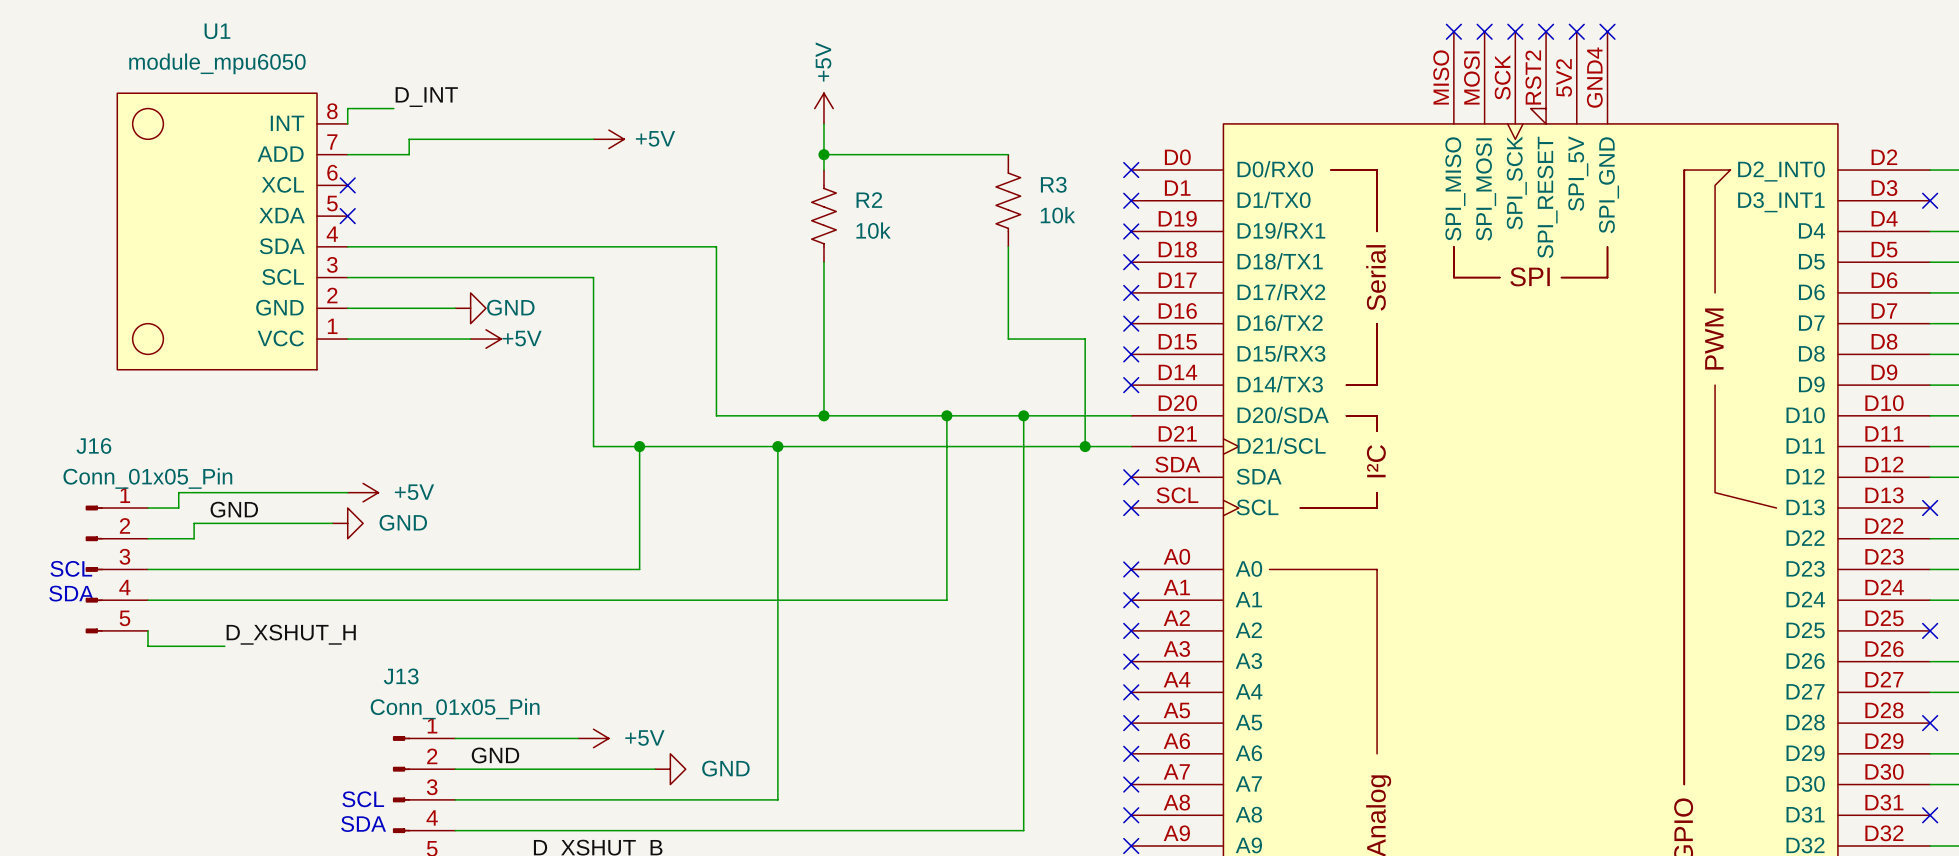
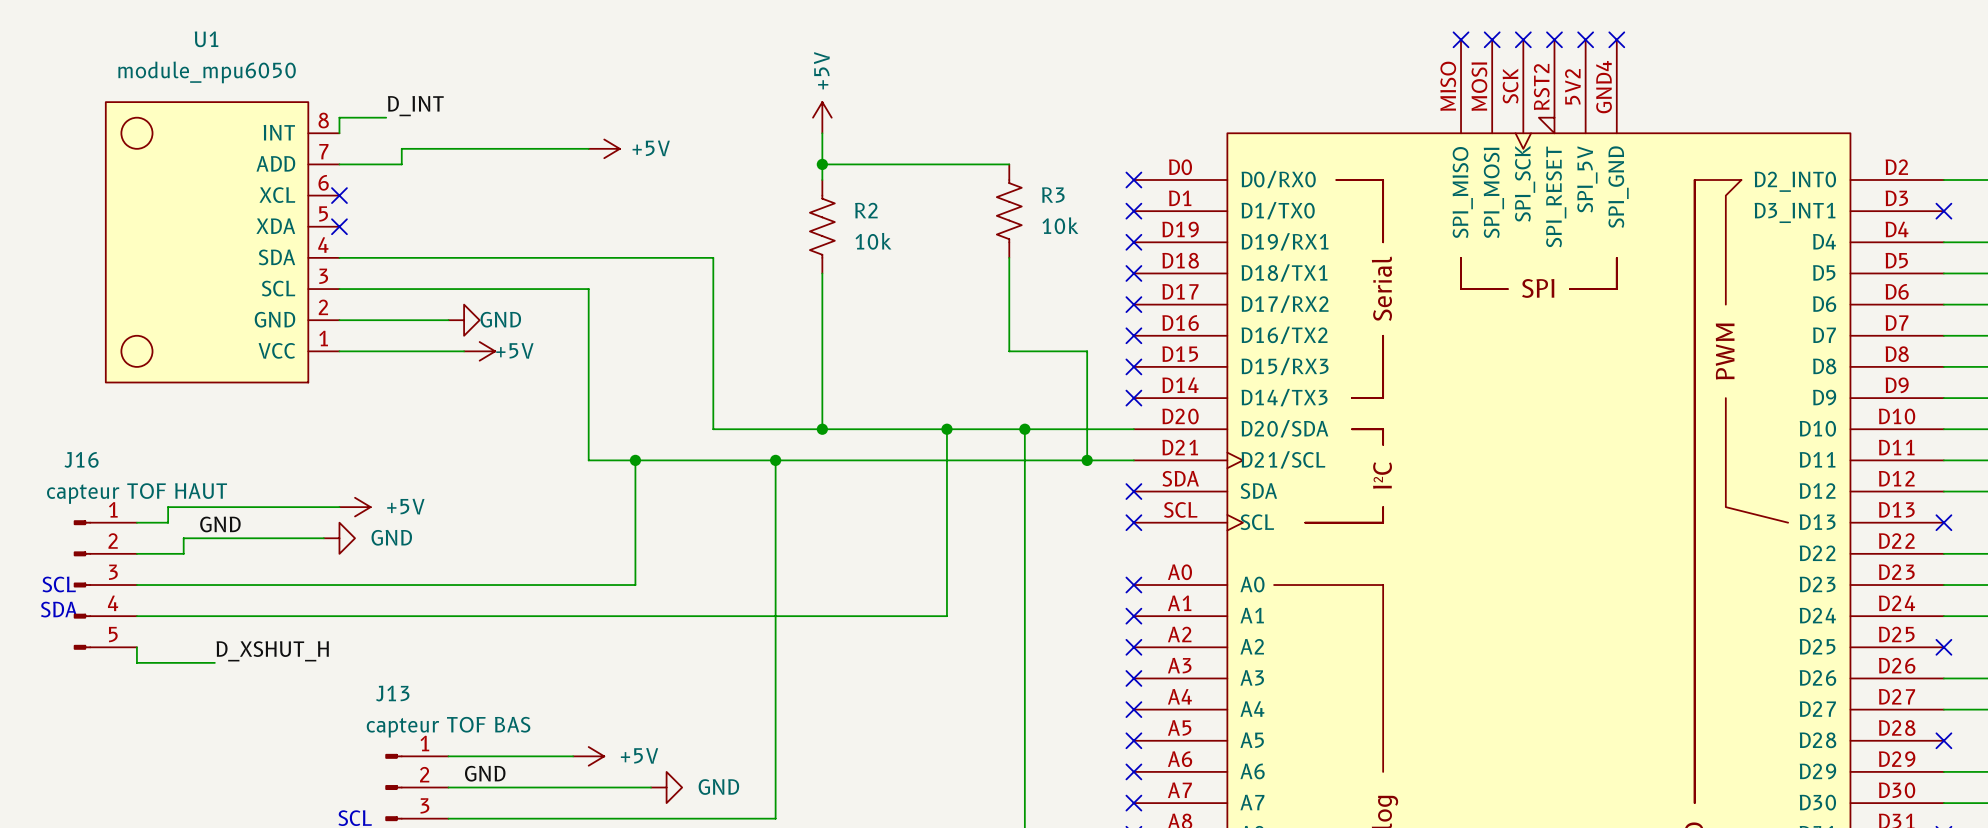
J16 value: Conn_01x05_Pin (147, 478) -> capteur TOF HAUT (137, 493)
J13 value: Conn_01x05_Pin (455, 708) -> capteur TOF BAS (448, 727)

